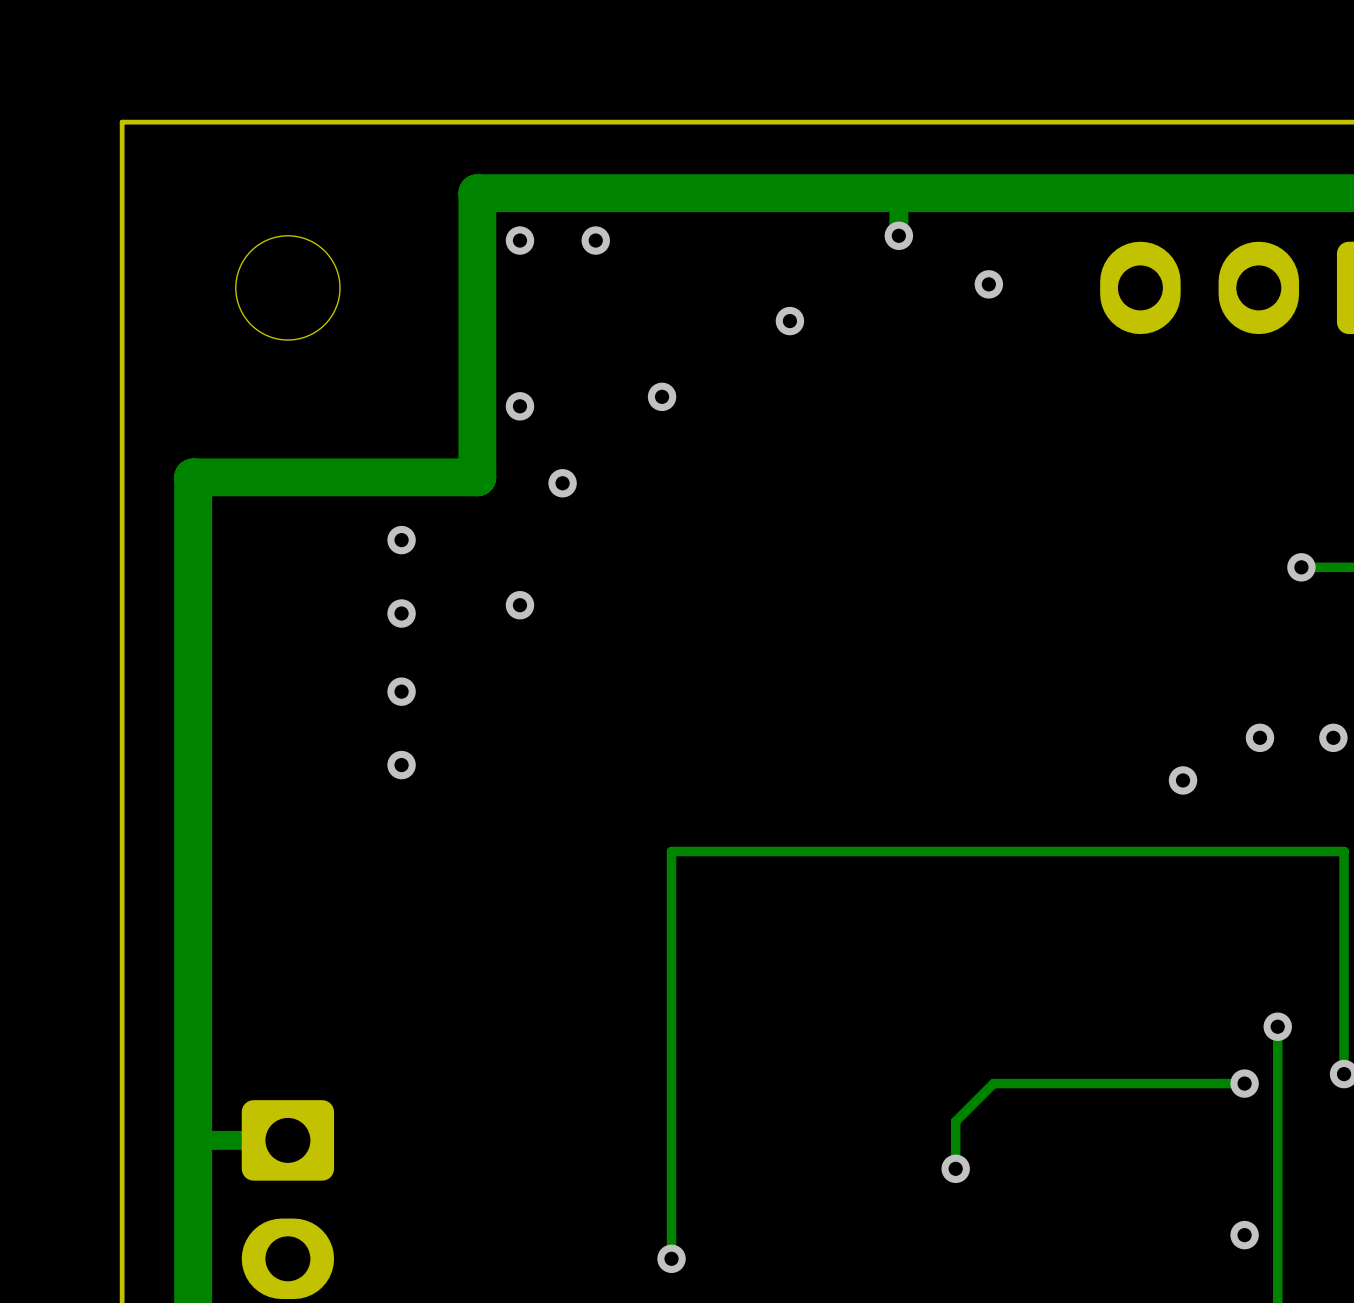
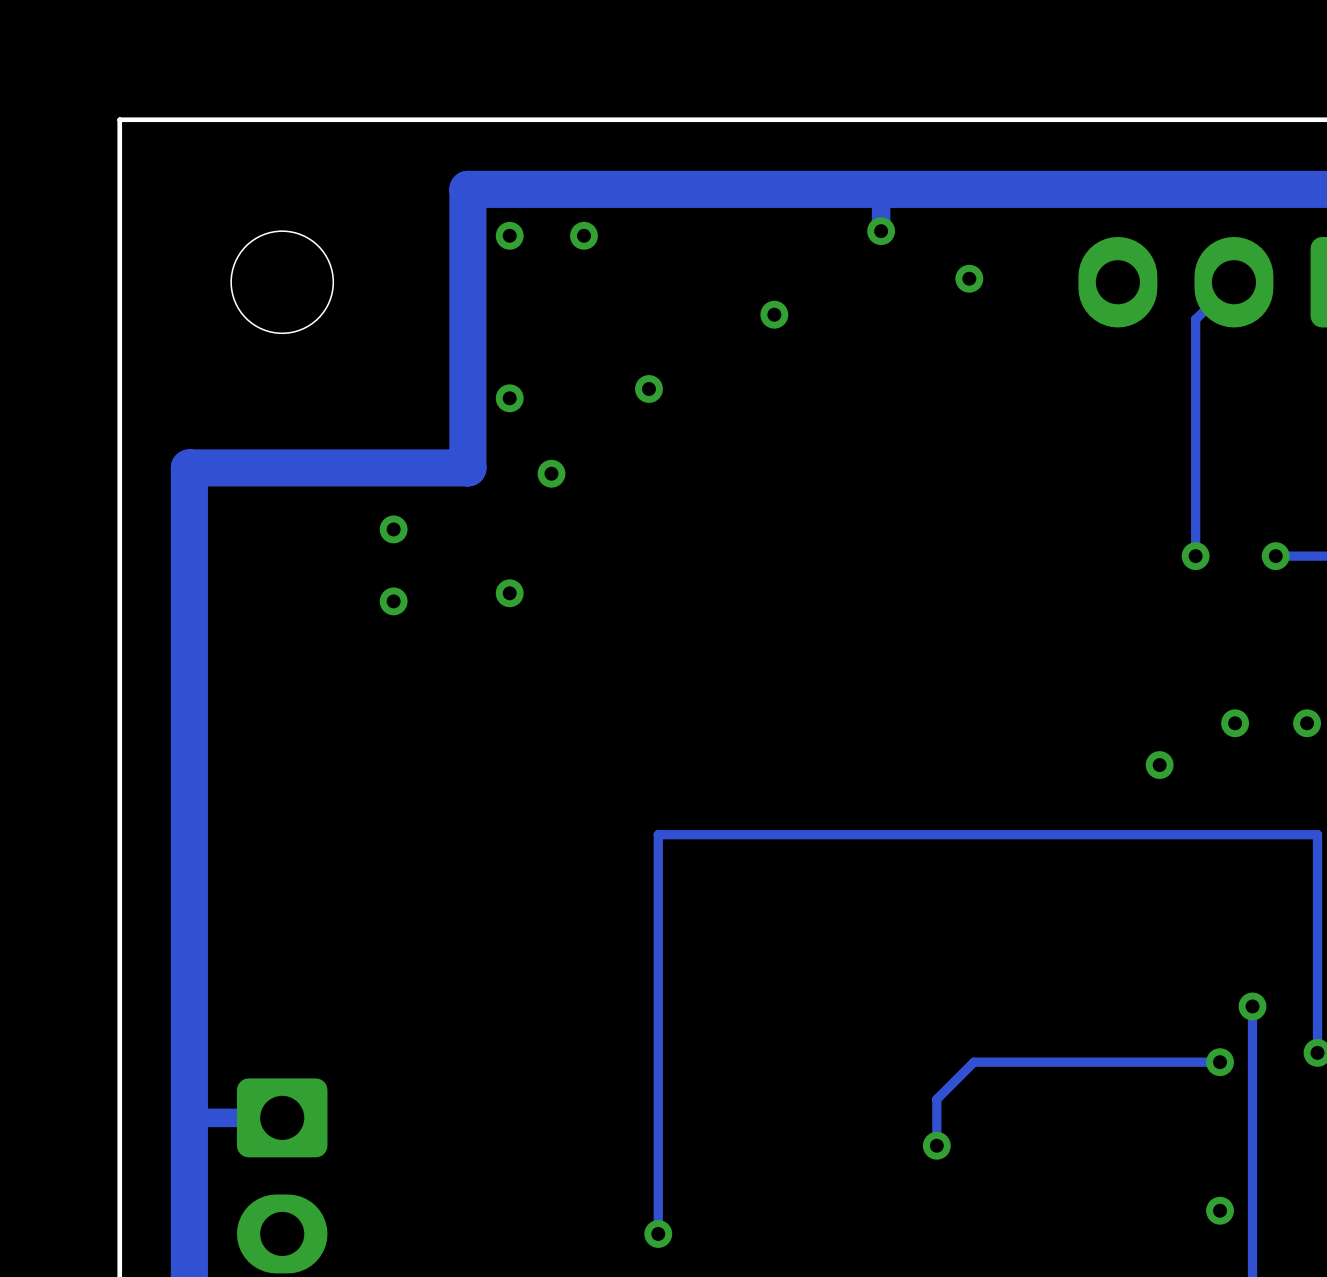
track: none -> (1233, 282) (1195, 319) (1195, 556)
via: none -> (1195, 556)
via: (401, 691) -> none
via: (401, 765) -> none

